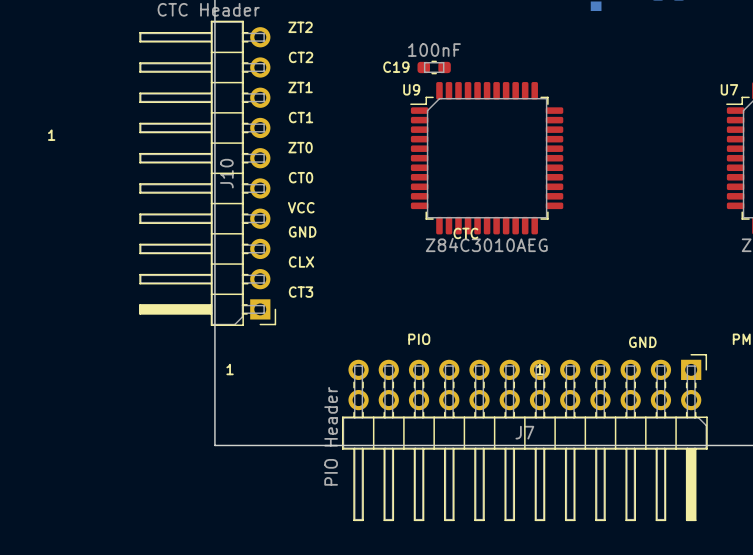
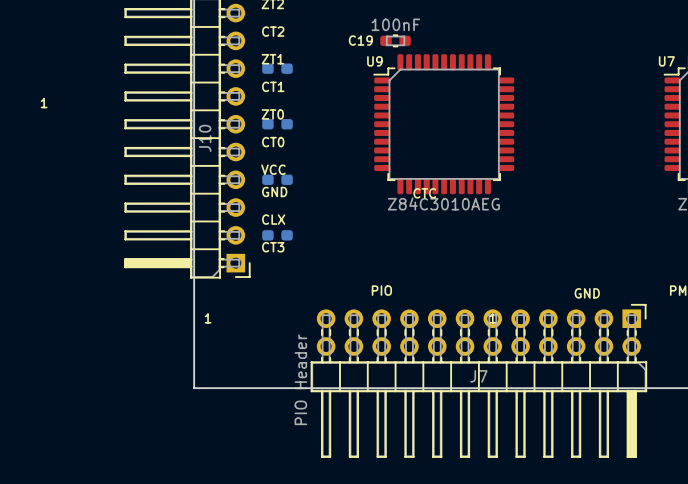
part: none -> (277, 68)
part: none -> (277, 124)
part: none -> (277, 179)
part: none -> (277, 235)

